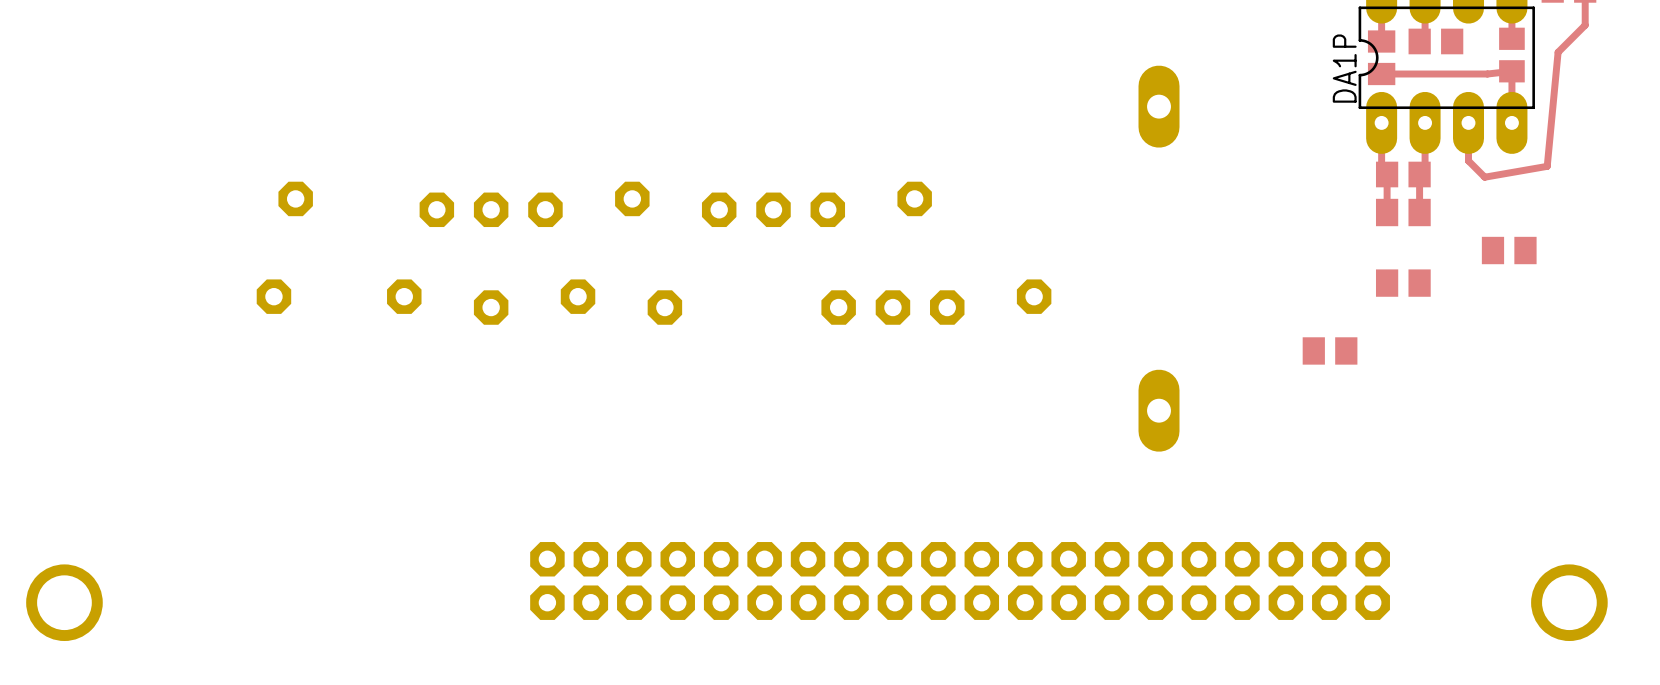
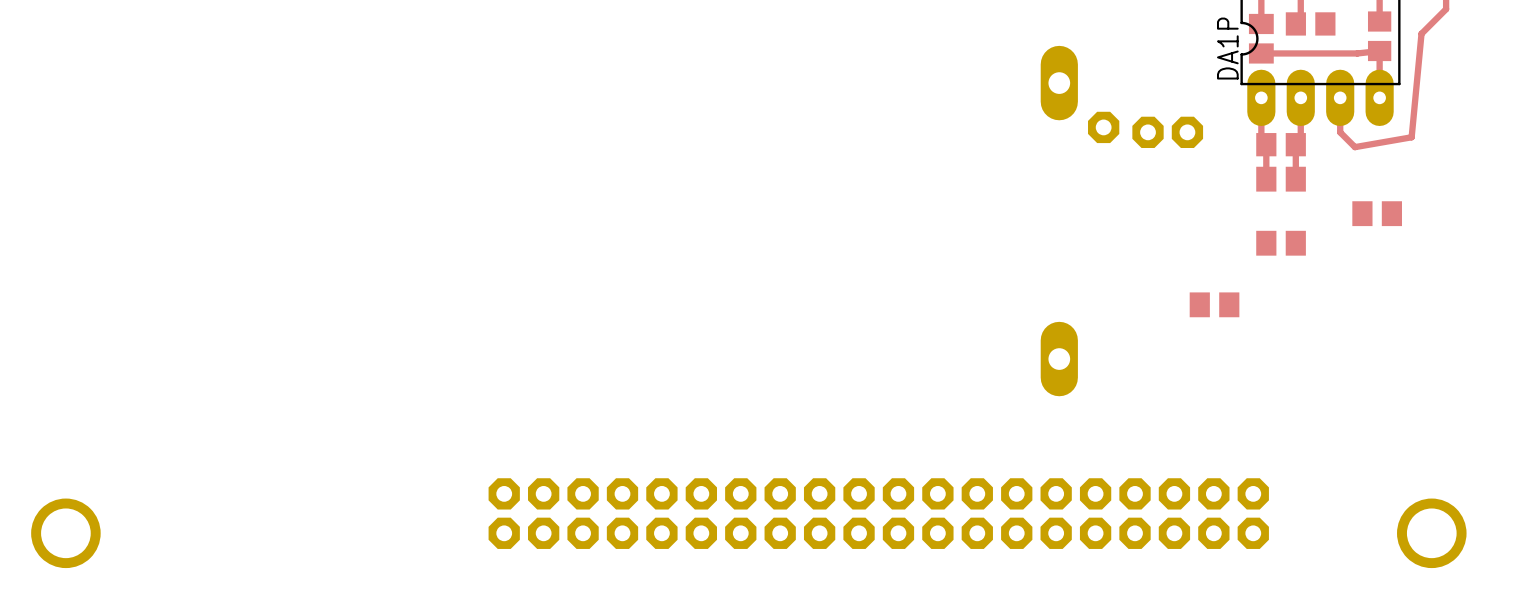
part: none -> (1103, 127)
part: none -> (1148, 132)
part: none -> (1187, 132)
part: (295, 198) -> none
part: (632, 198) -> none
part: (914, 198) -> none
part: (436, 209) -> none
part: (491, 209) -> none
part: (545, 209) -> none
part: (719, 209) -> none
part: (773, 209) -> none
part: (827, 209) -> none
part: (273, 296) -> none
part: (404, 296) -> none
part: (578, 296) -> none
part: (1034, 296) -> none
part: (491, 307) -> none
part: (664, 307) -> none
part: (838, 307) -> none
part: (892, 307) -> none
part: (947, 307) -> none

